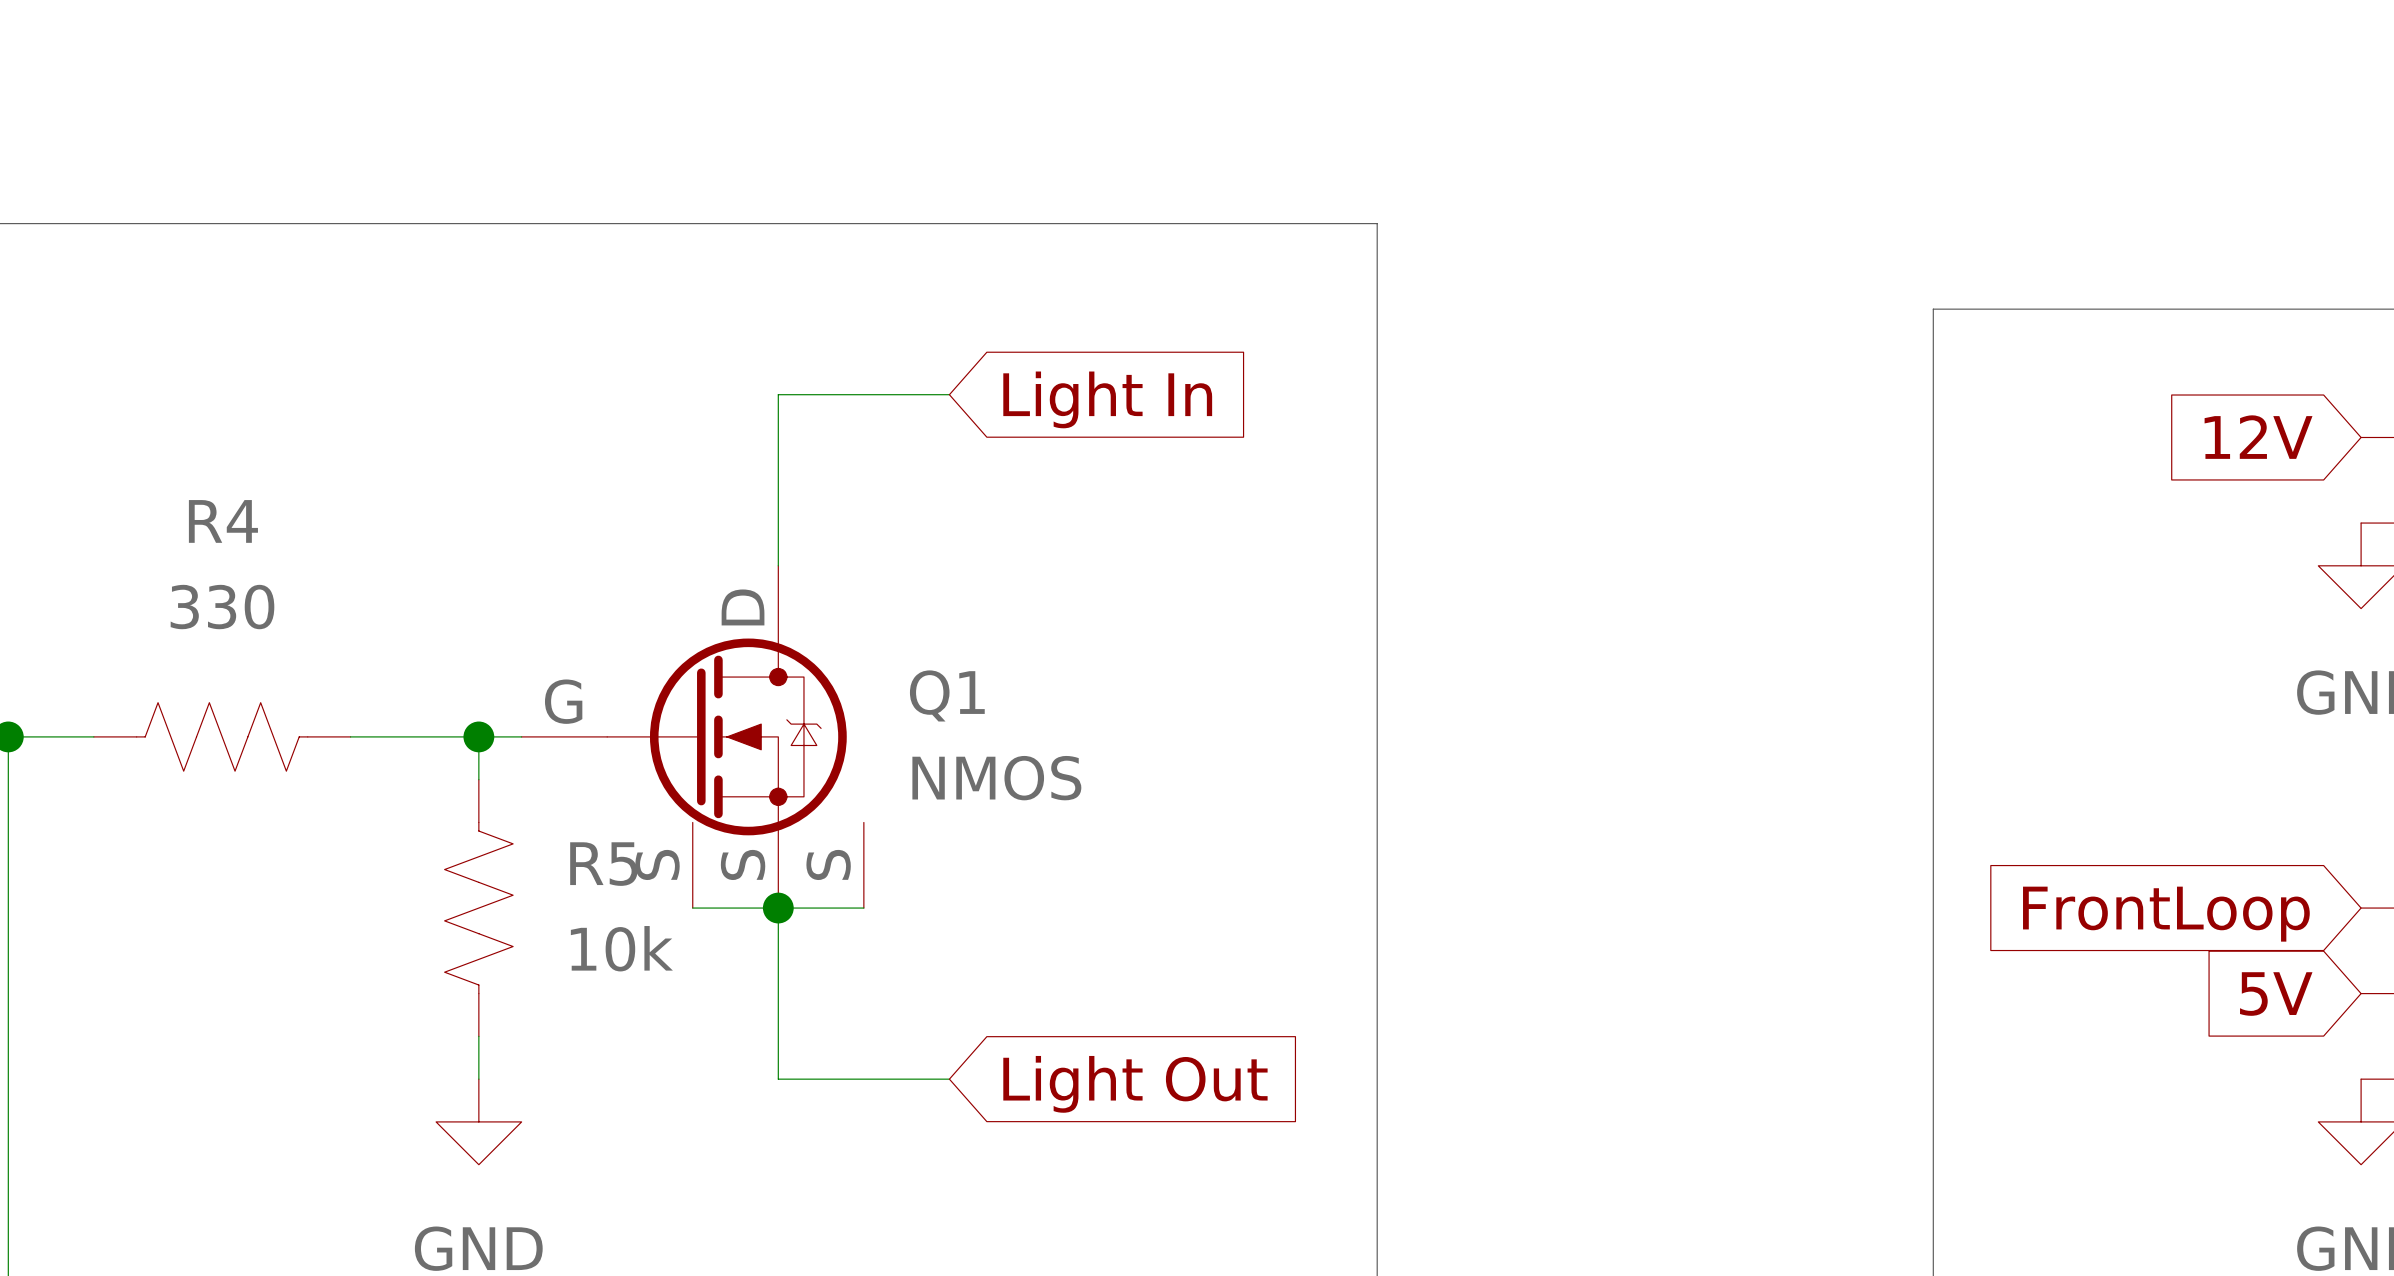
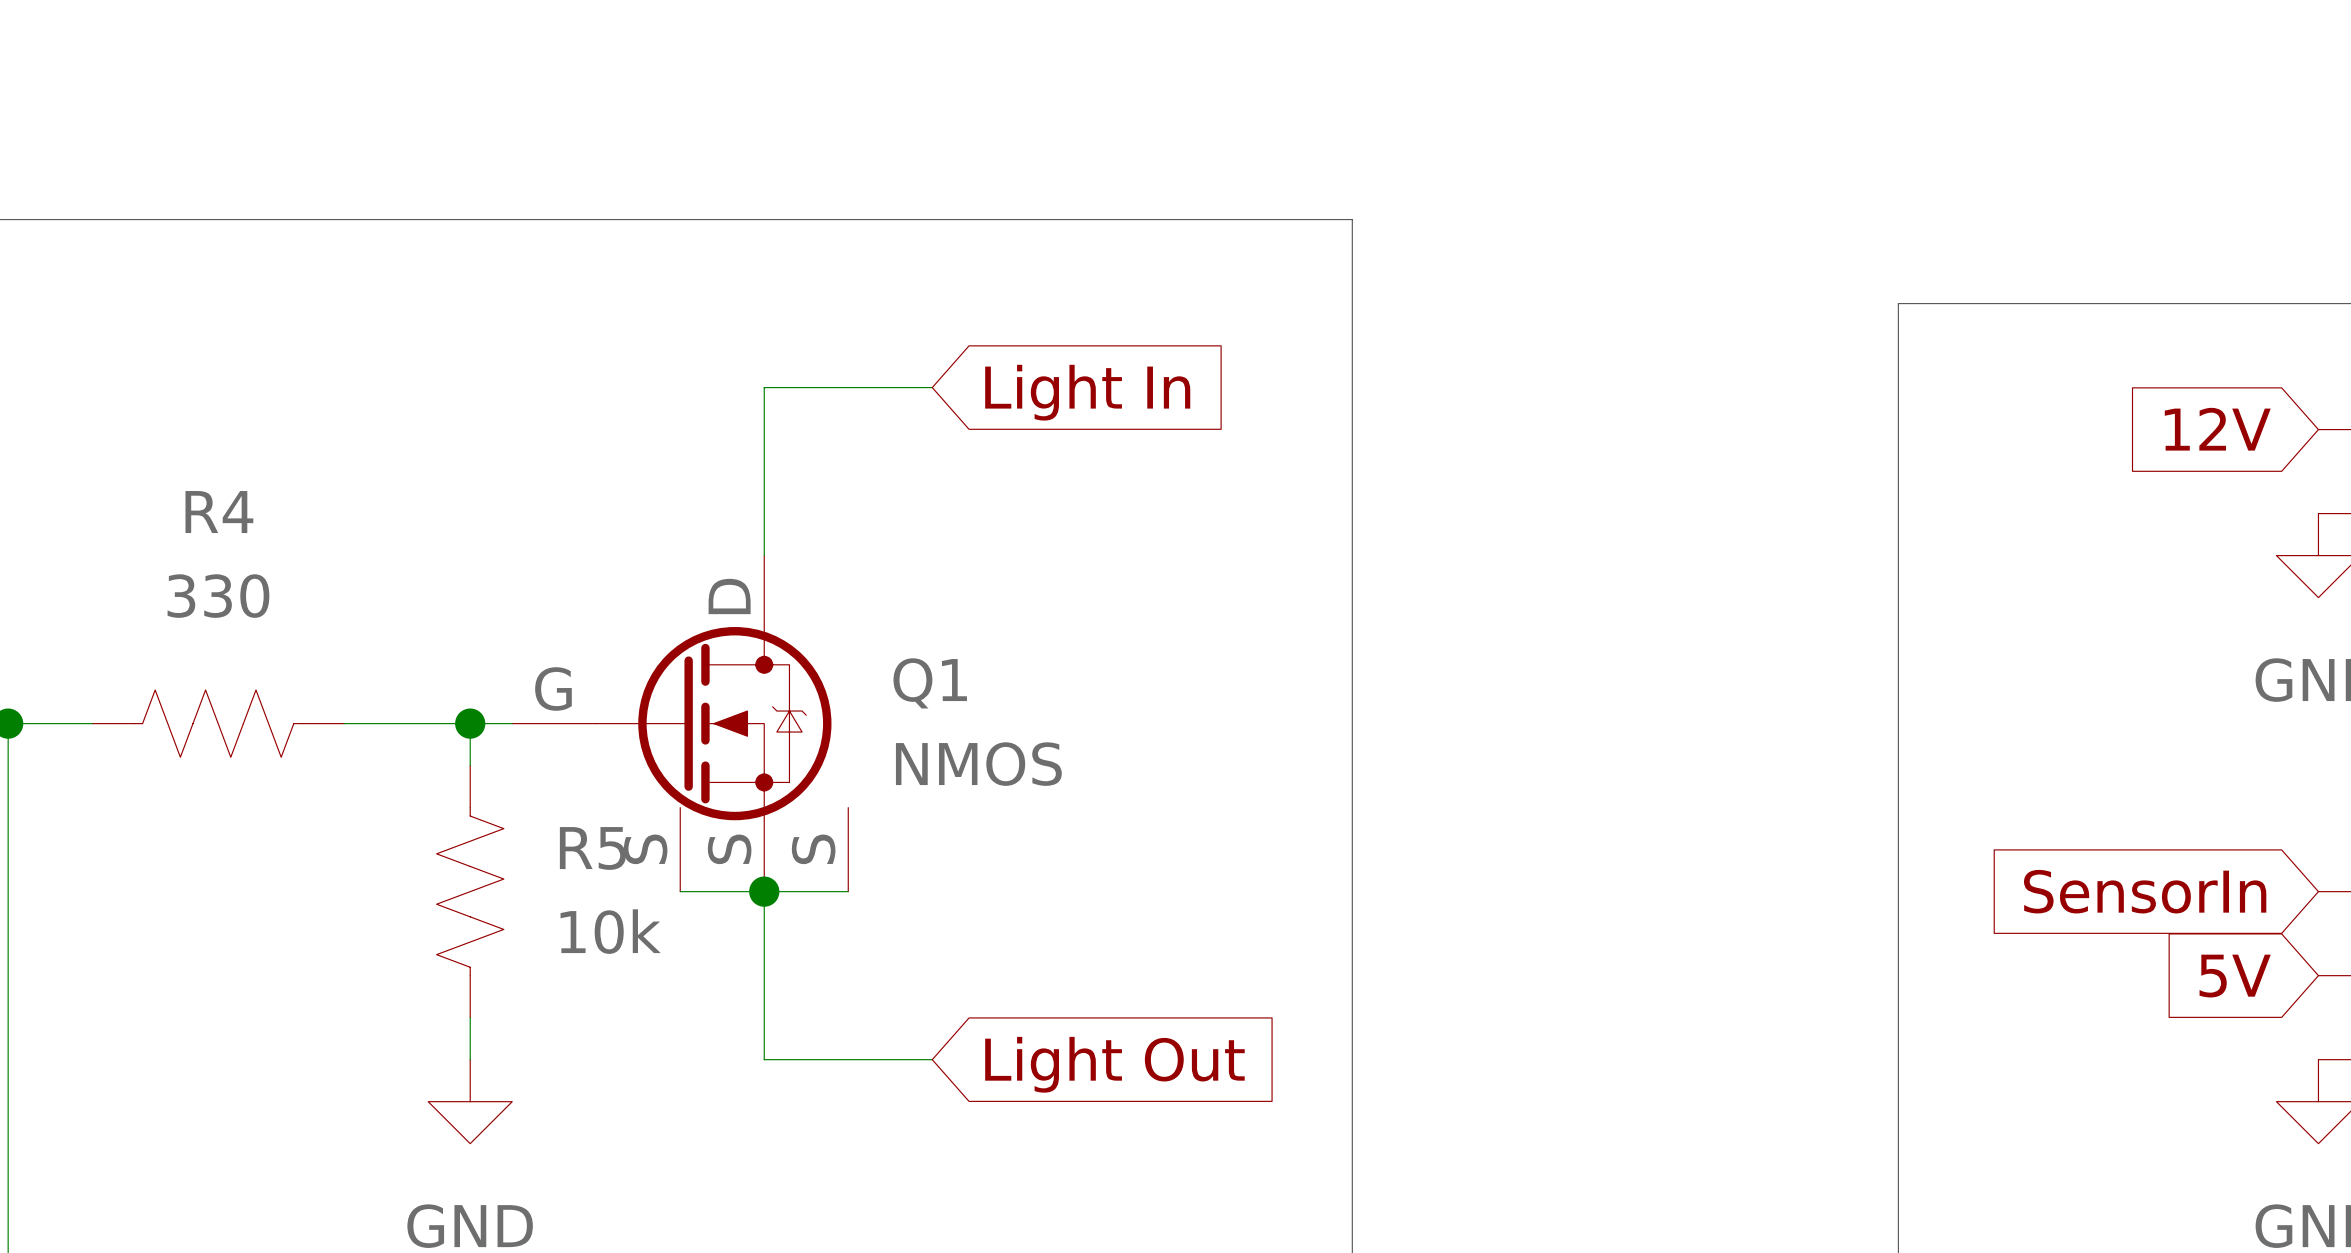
global label: FrontLoop (2166, 914) -> SensorIn (2145, 891)

